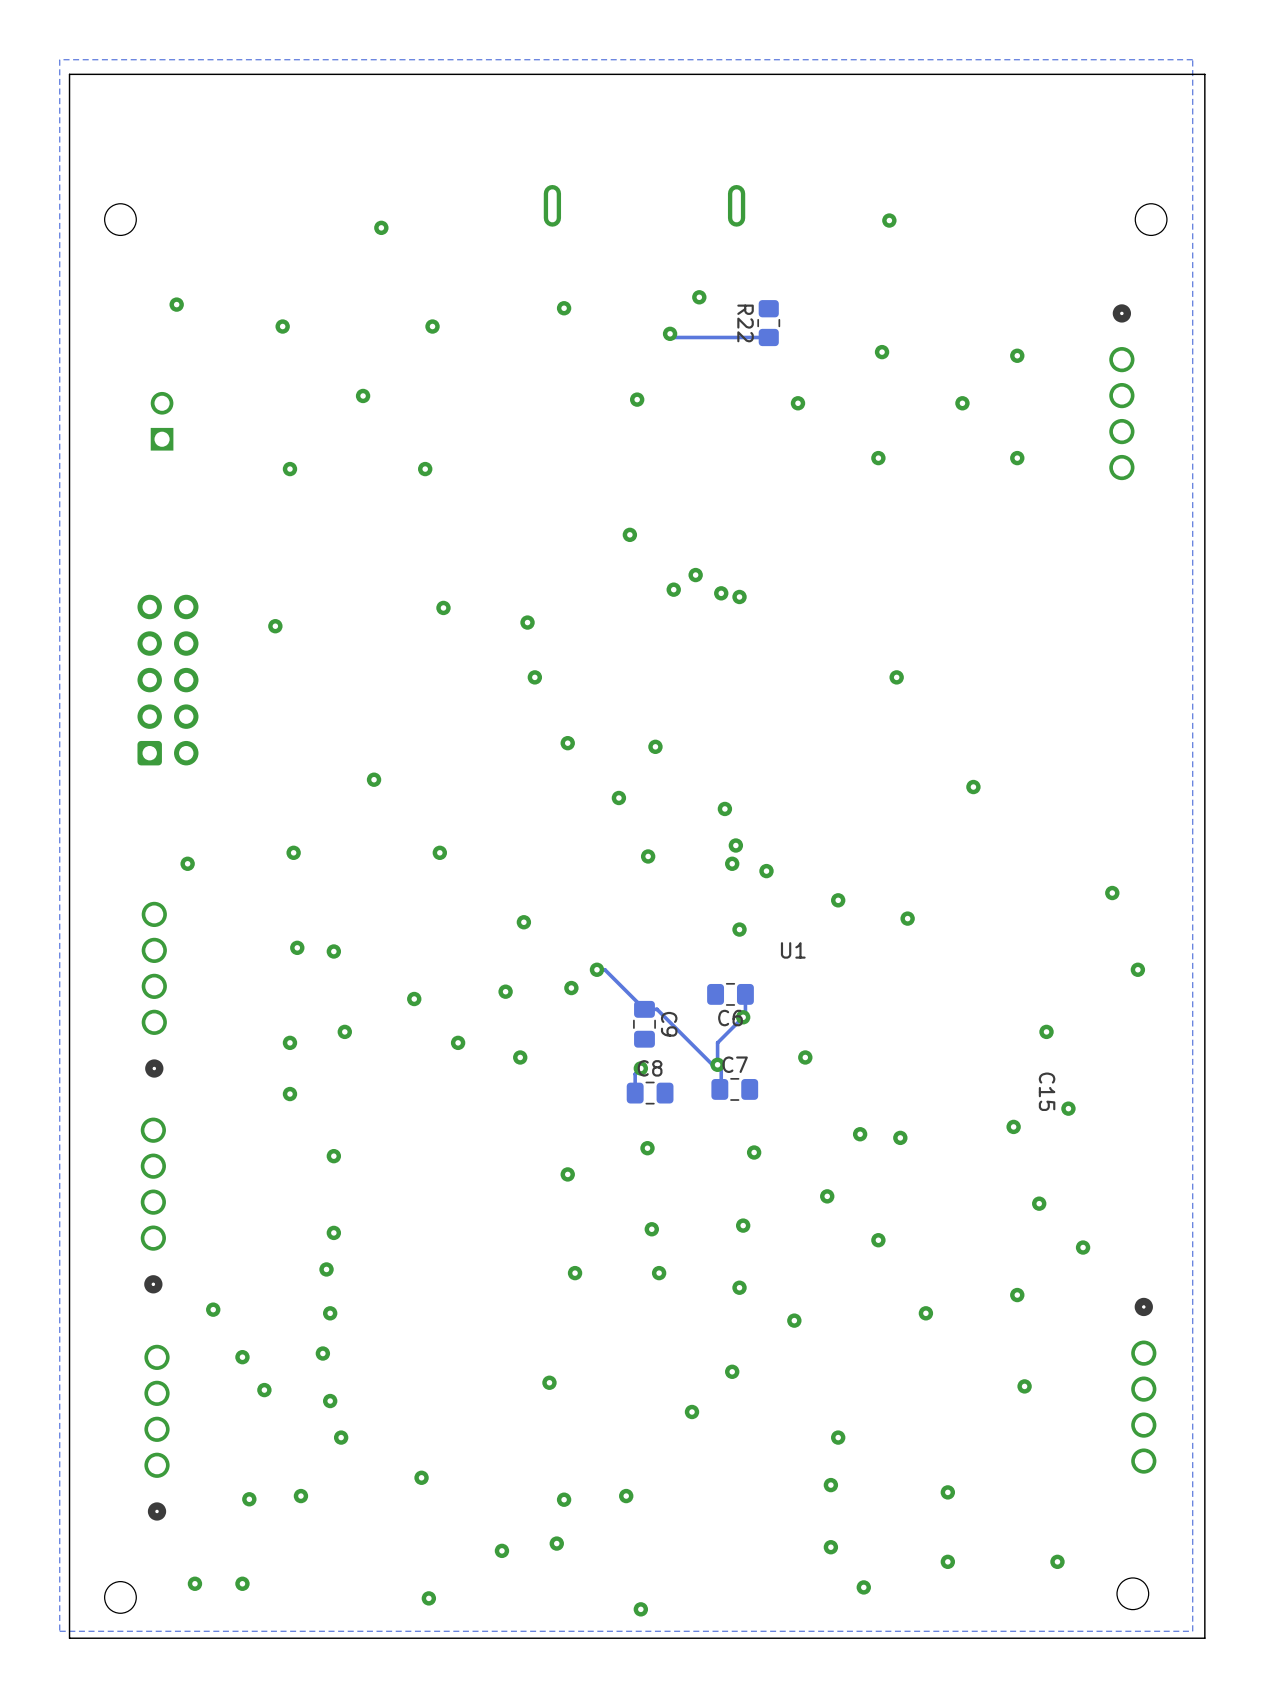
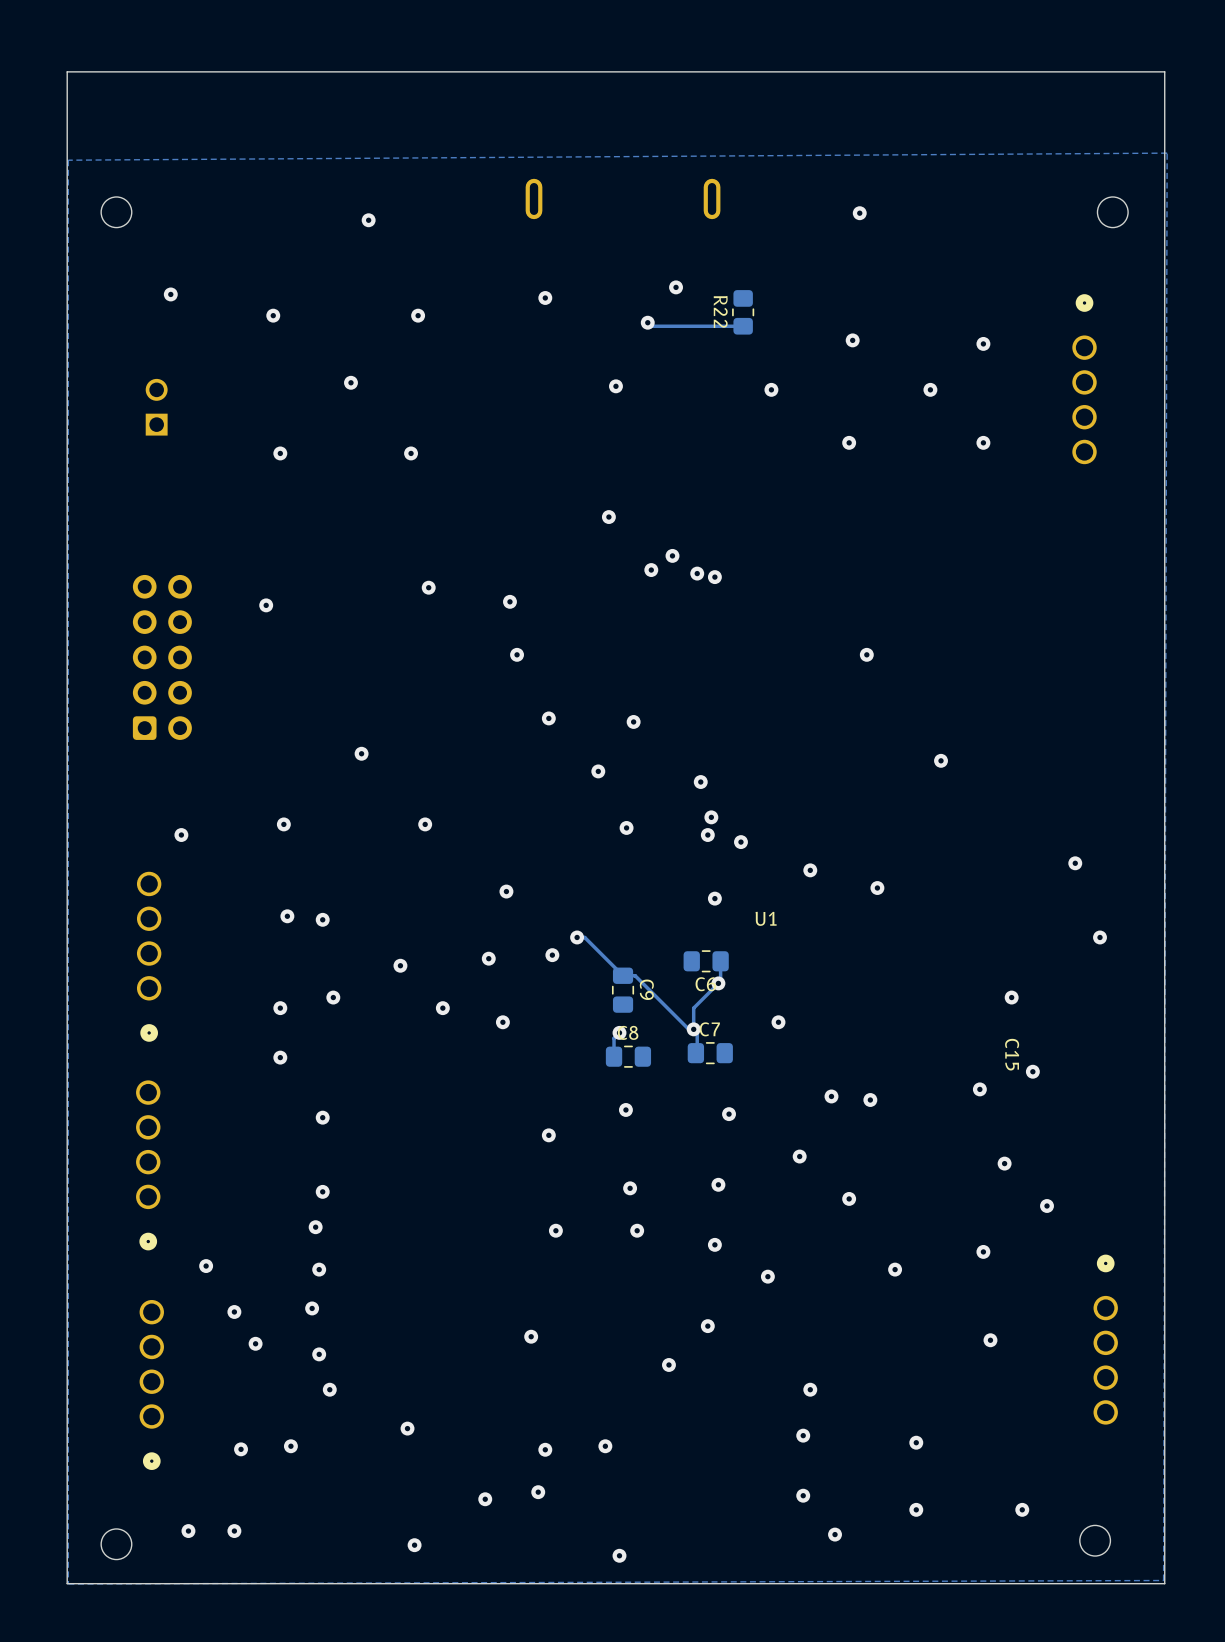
zone outline: (1192, 59) (59, 59) (59, 1631) (1192, 1631) (1192, 59) -> (1167, 153) (1163, 1580) (68, 1584) (68, 160) (1167, 153)

